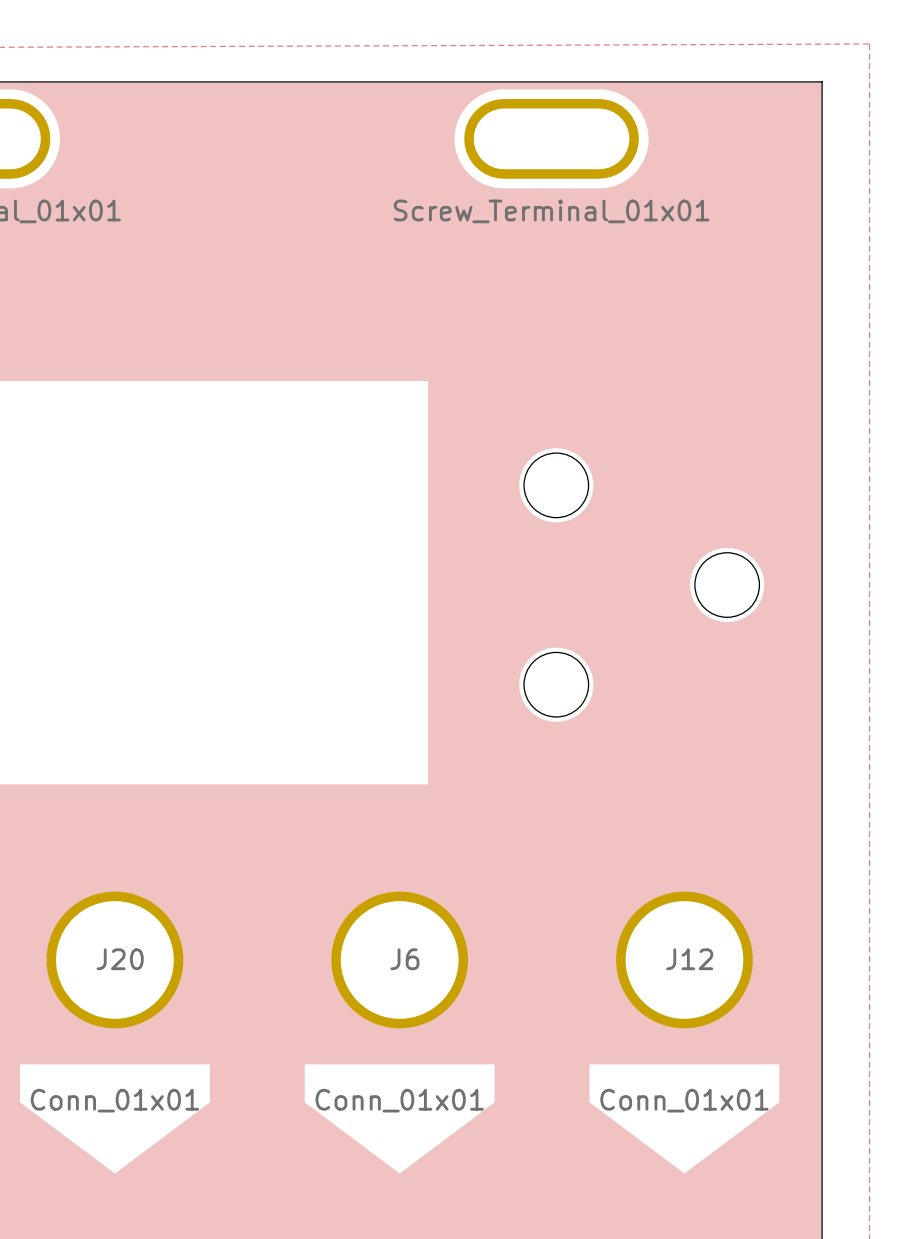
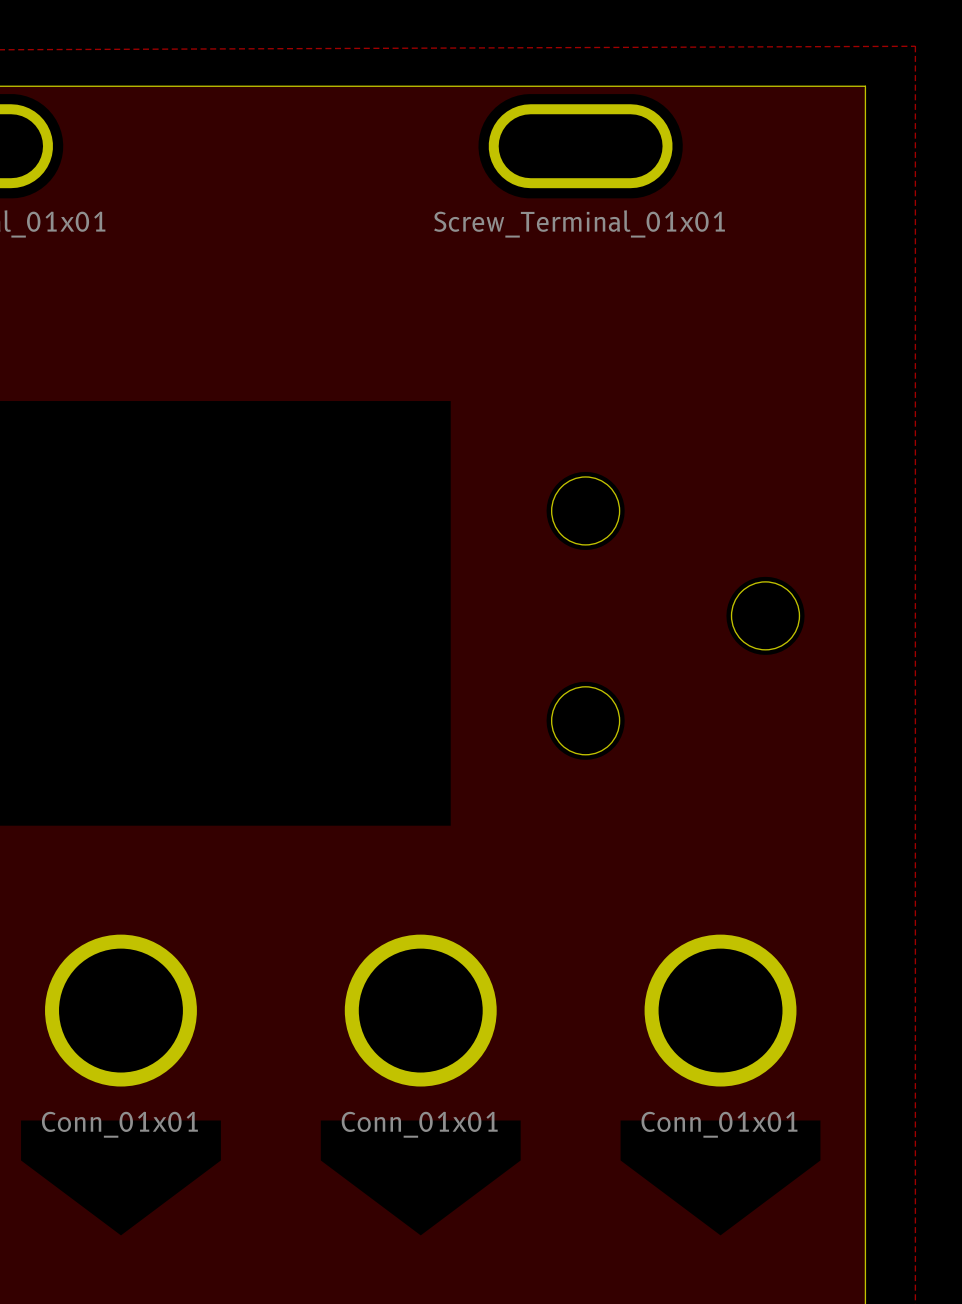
J20: Conn_01x01 (114, 959) -> none
part: none -> Conn_01x01 (120, 1010)
J6: Conn_01x01 (399, 959) -> none
part: none -> Conn_01x01 (420, 1010)
J12: Conn_01x01 (684, 959) -> none
part: none -> Conn_01x01 (720, 1010)

